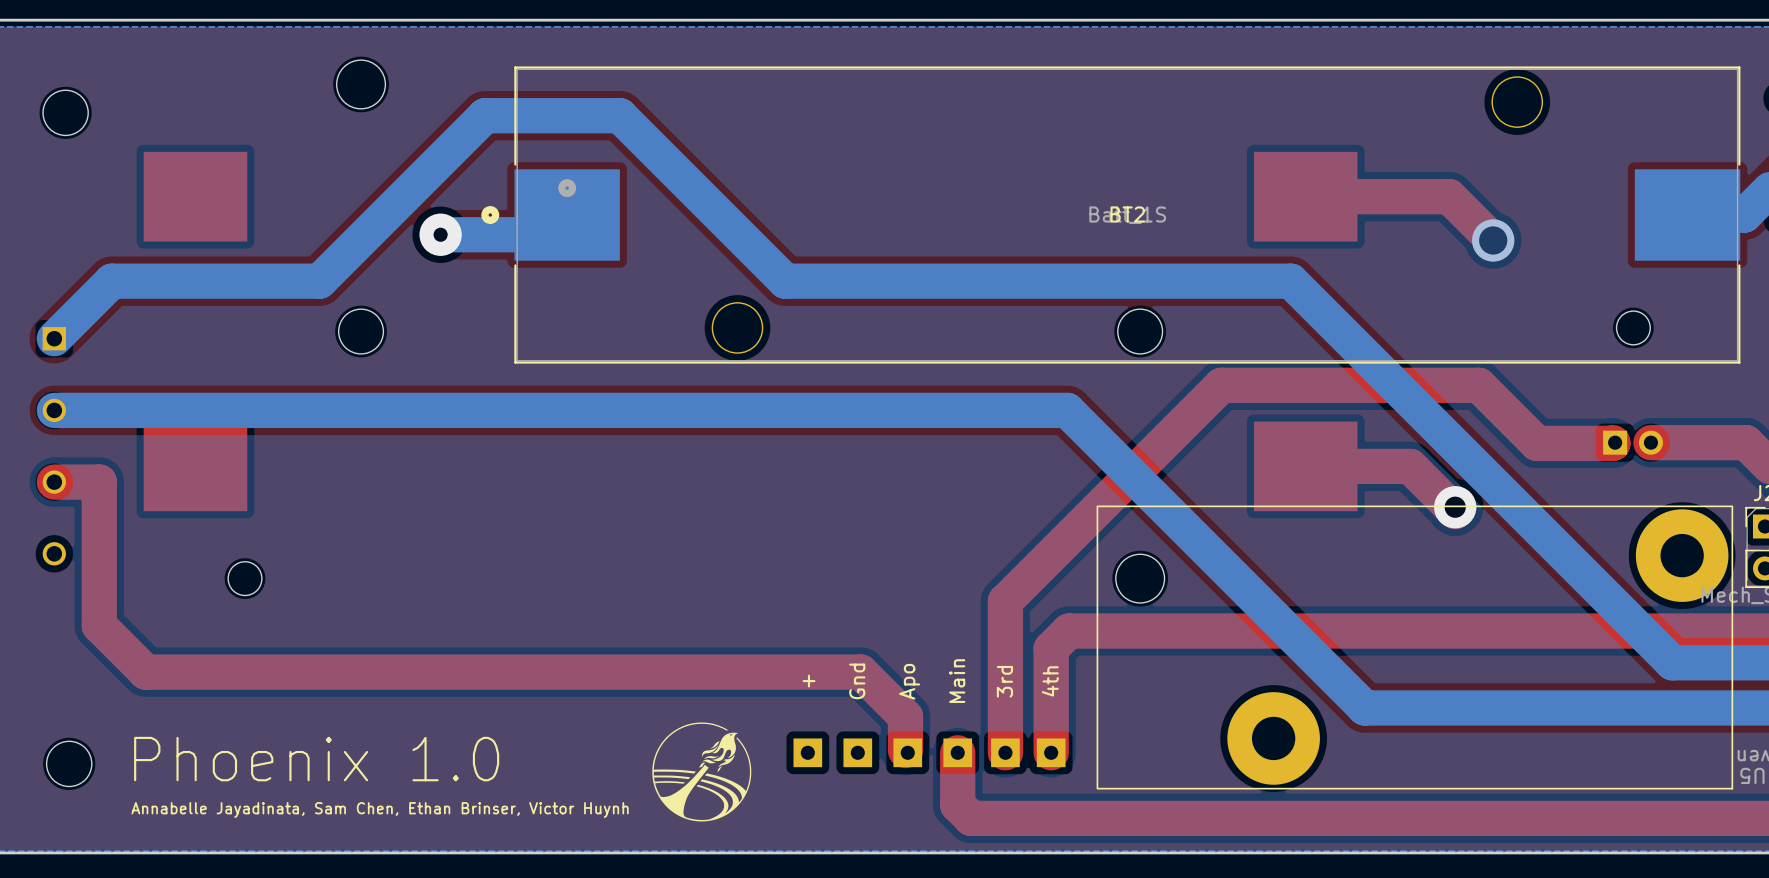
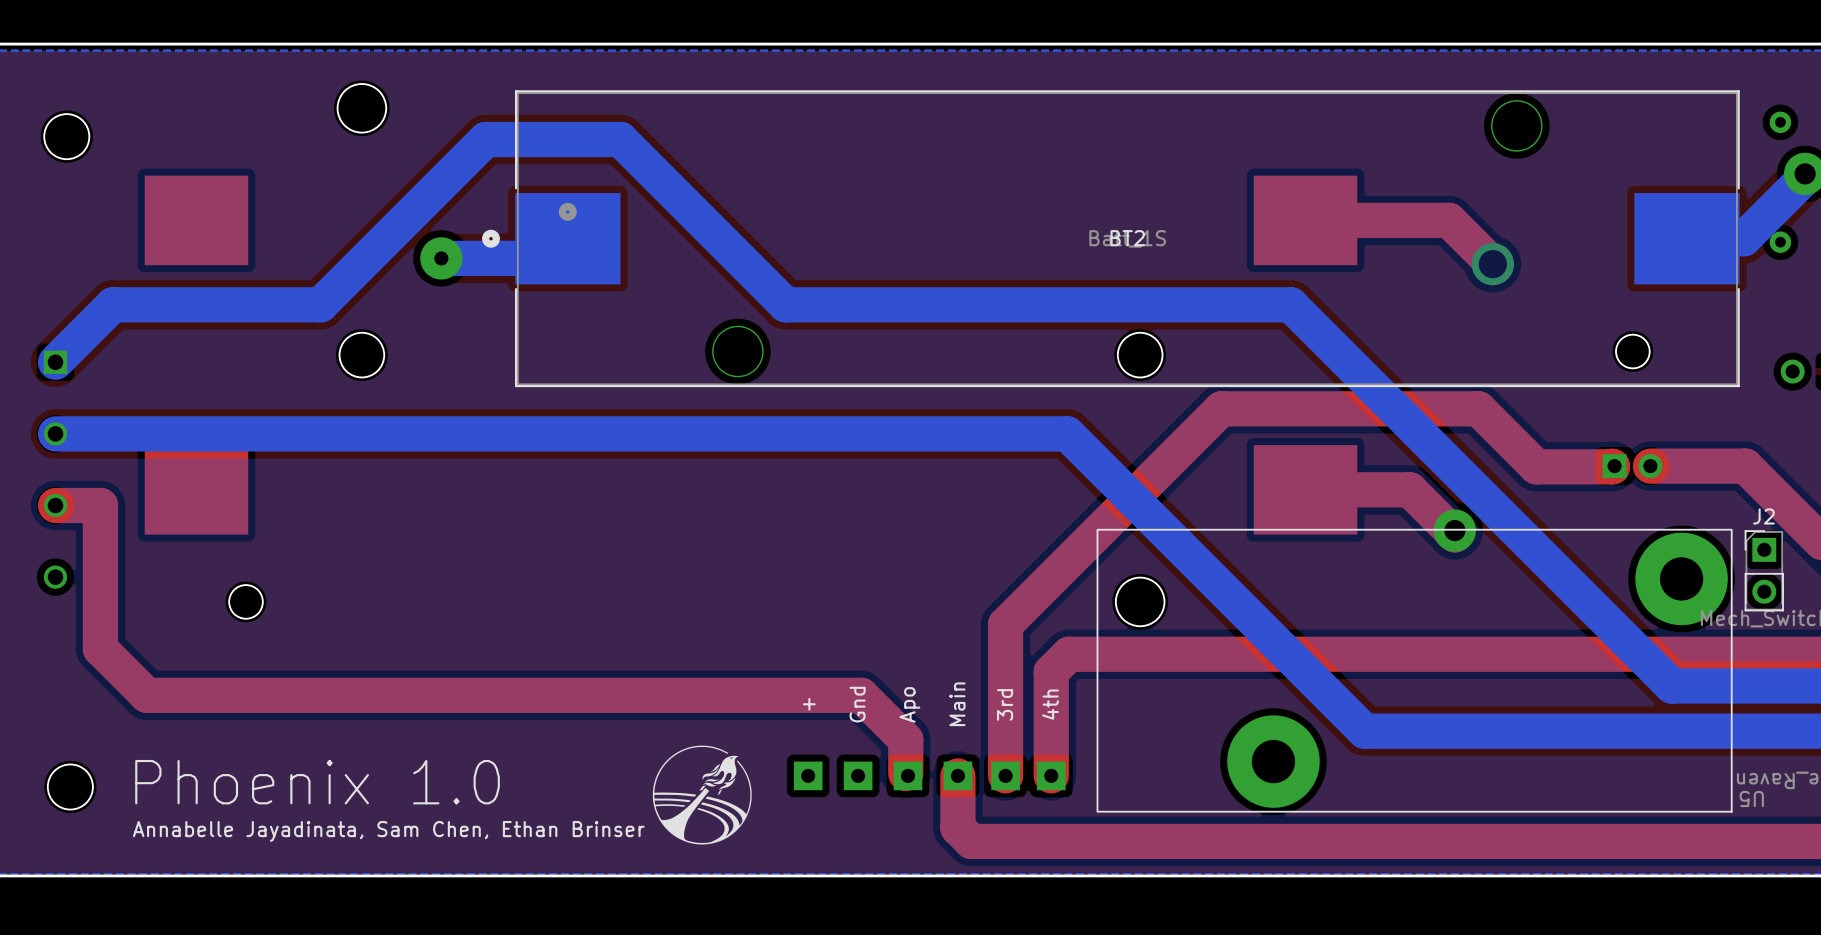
text: Annabelle Jayadinata, Sam Chen, Ethan Brinser, Victor Huynh (380, 809) -> Annabelle Jayadinata, Sam Chen, Ethan Brinser (388, 831)

